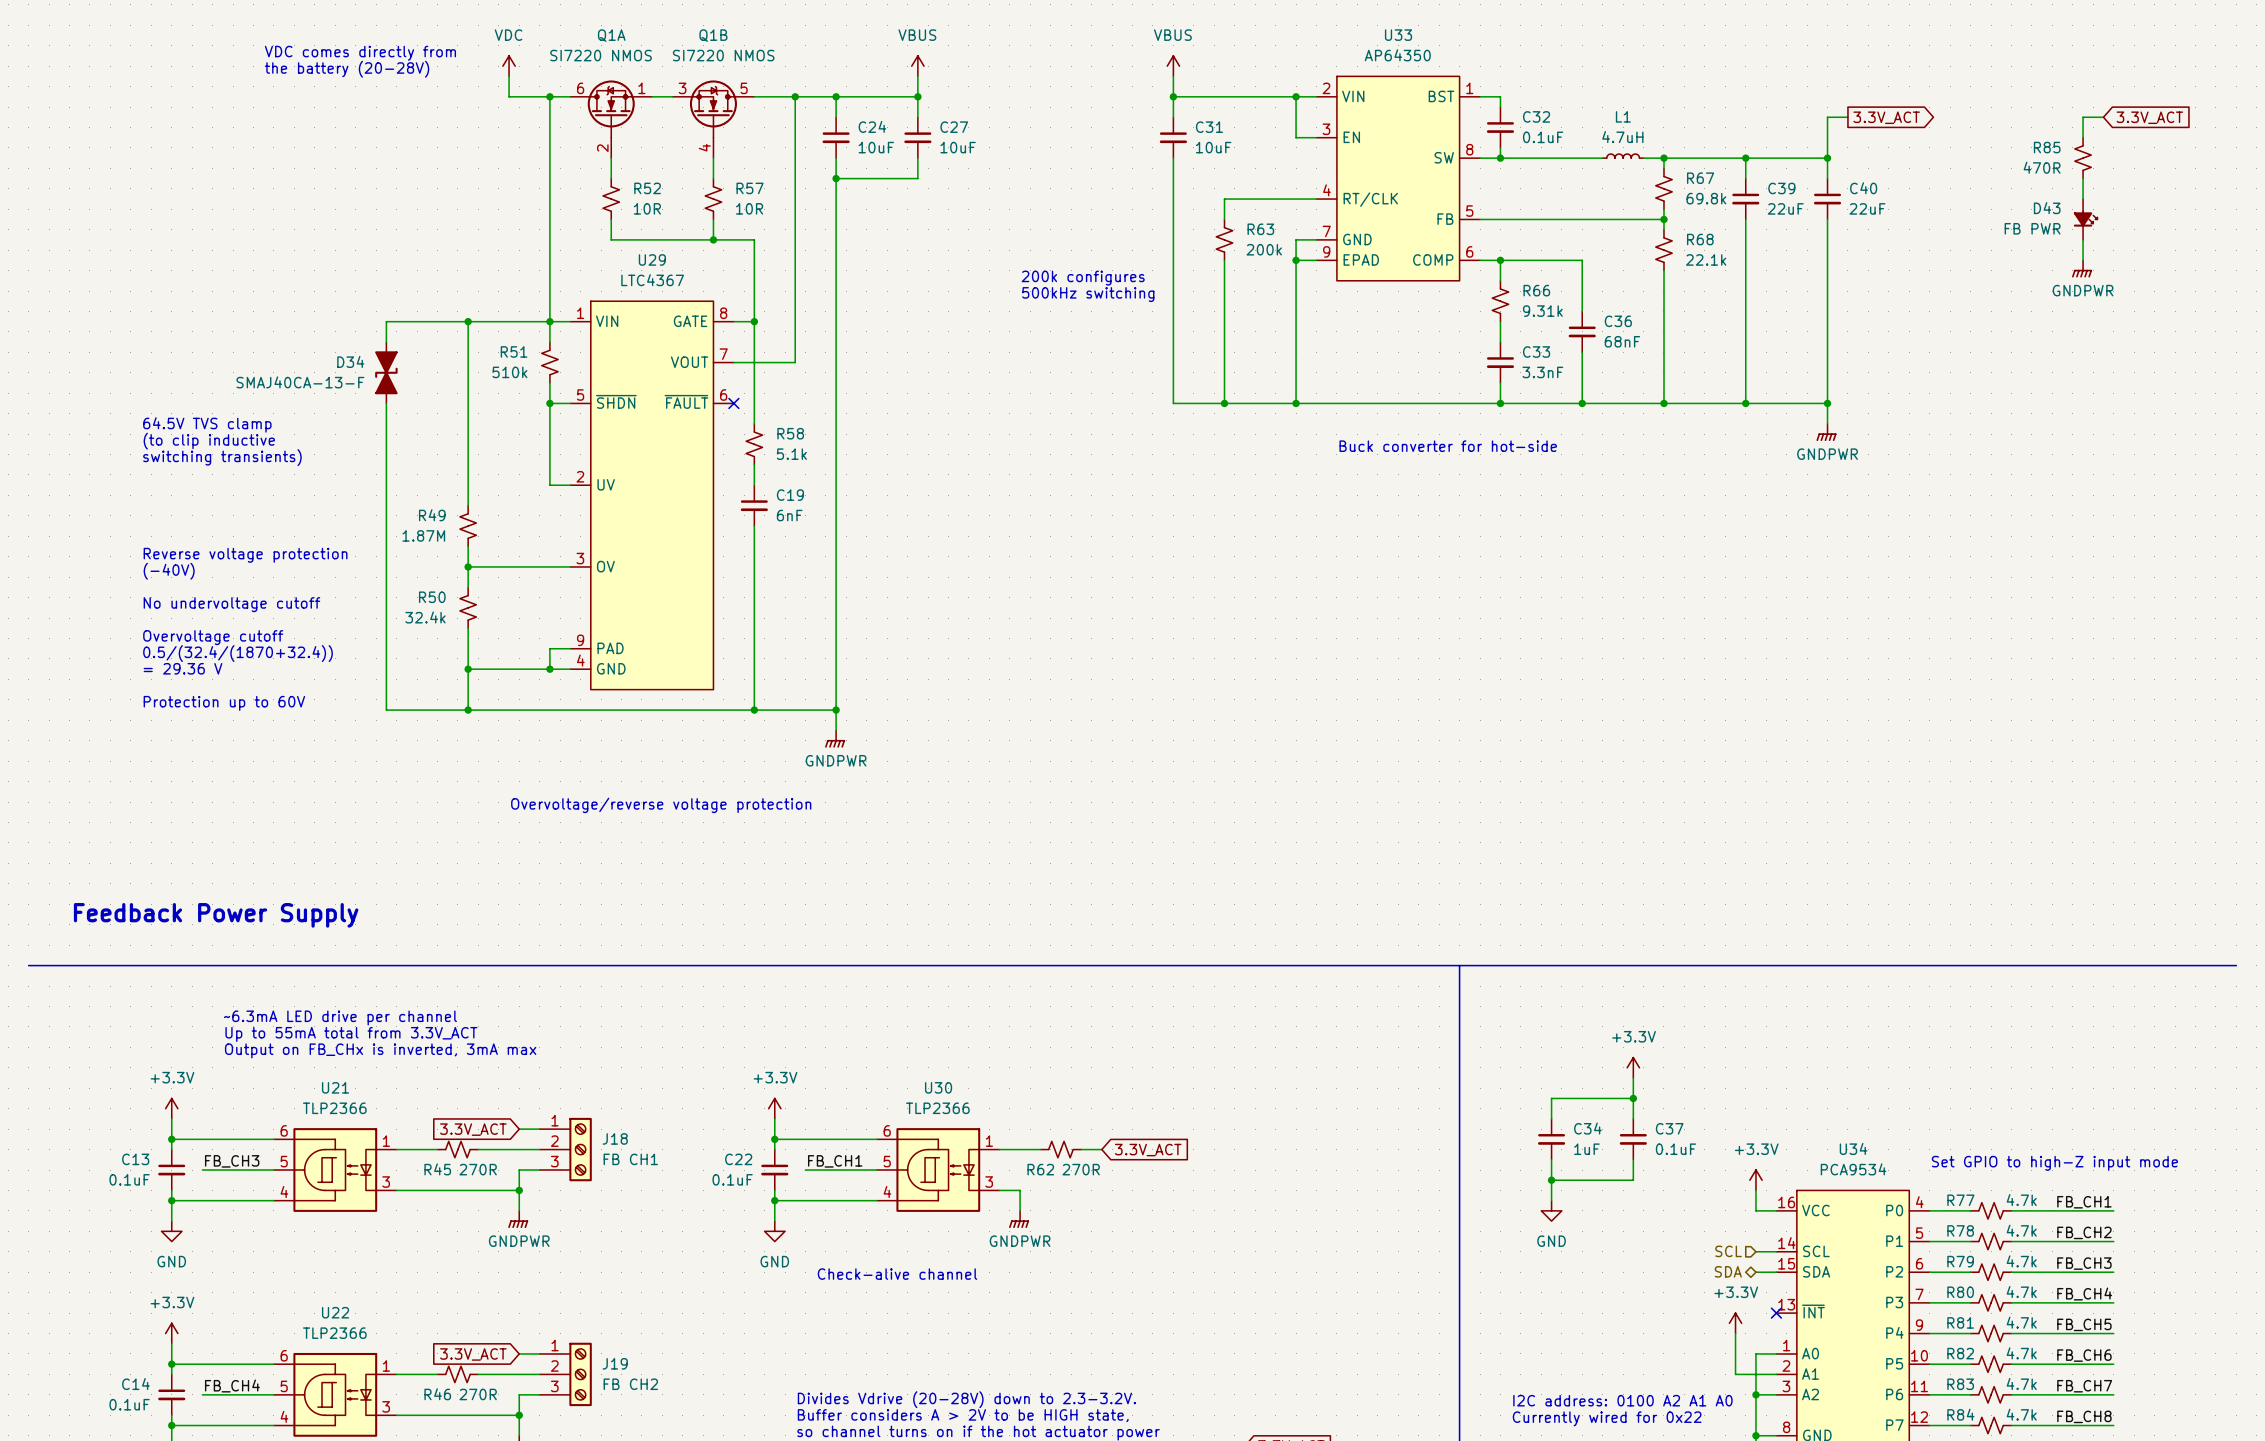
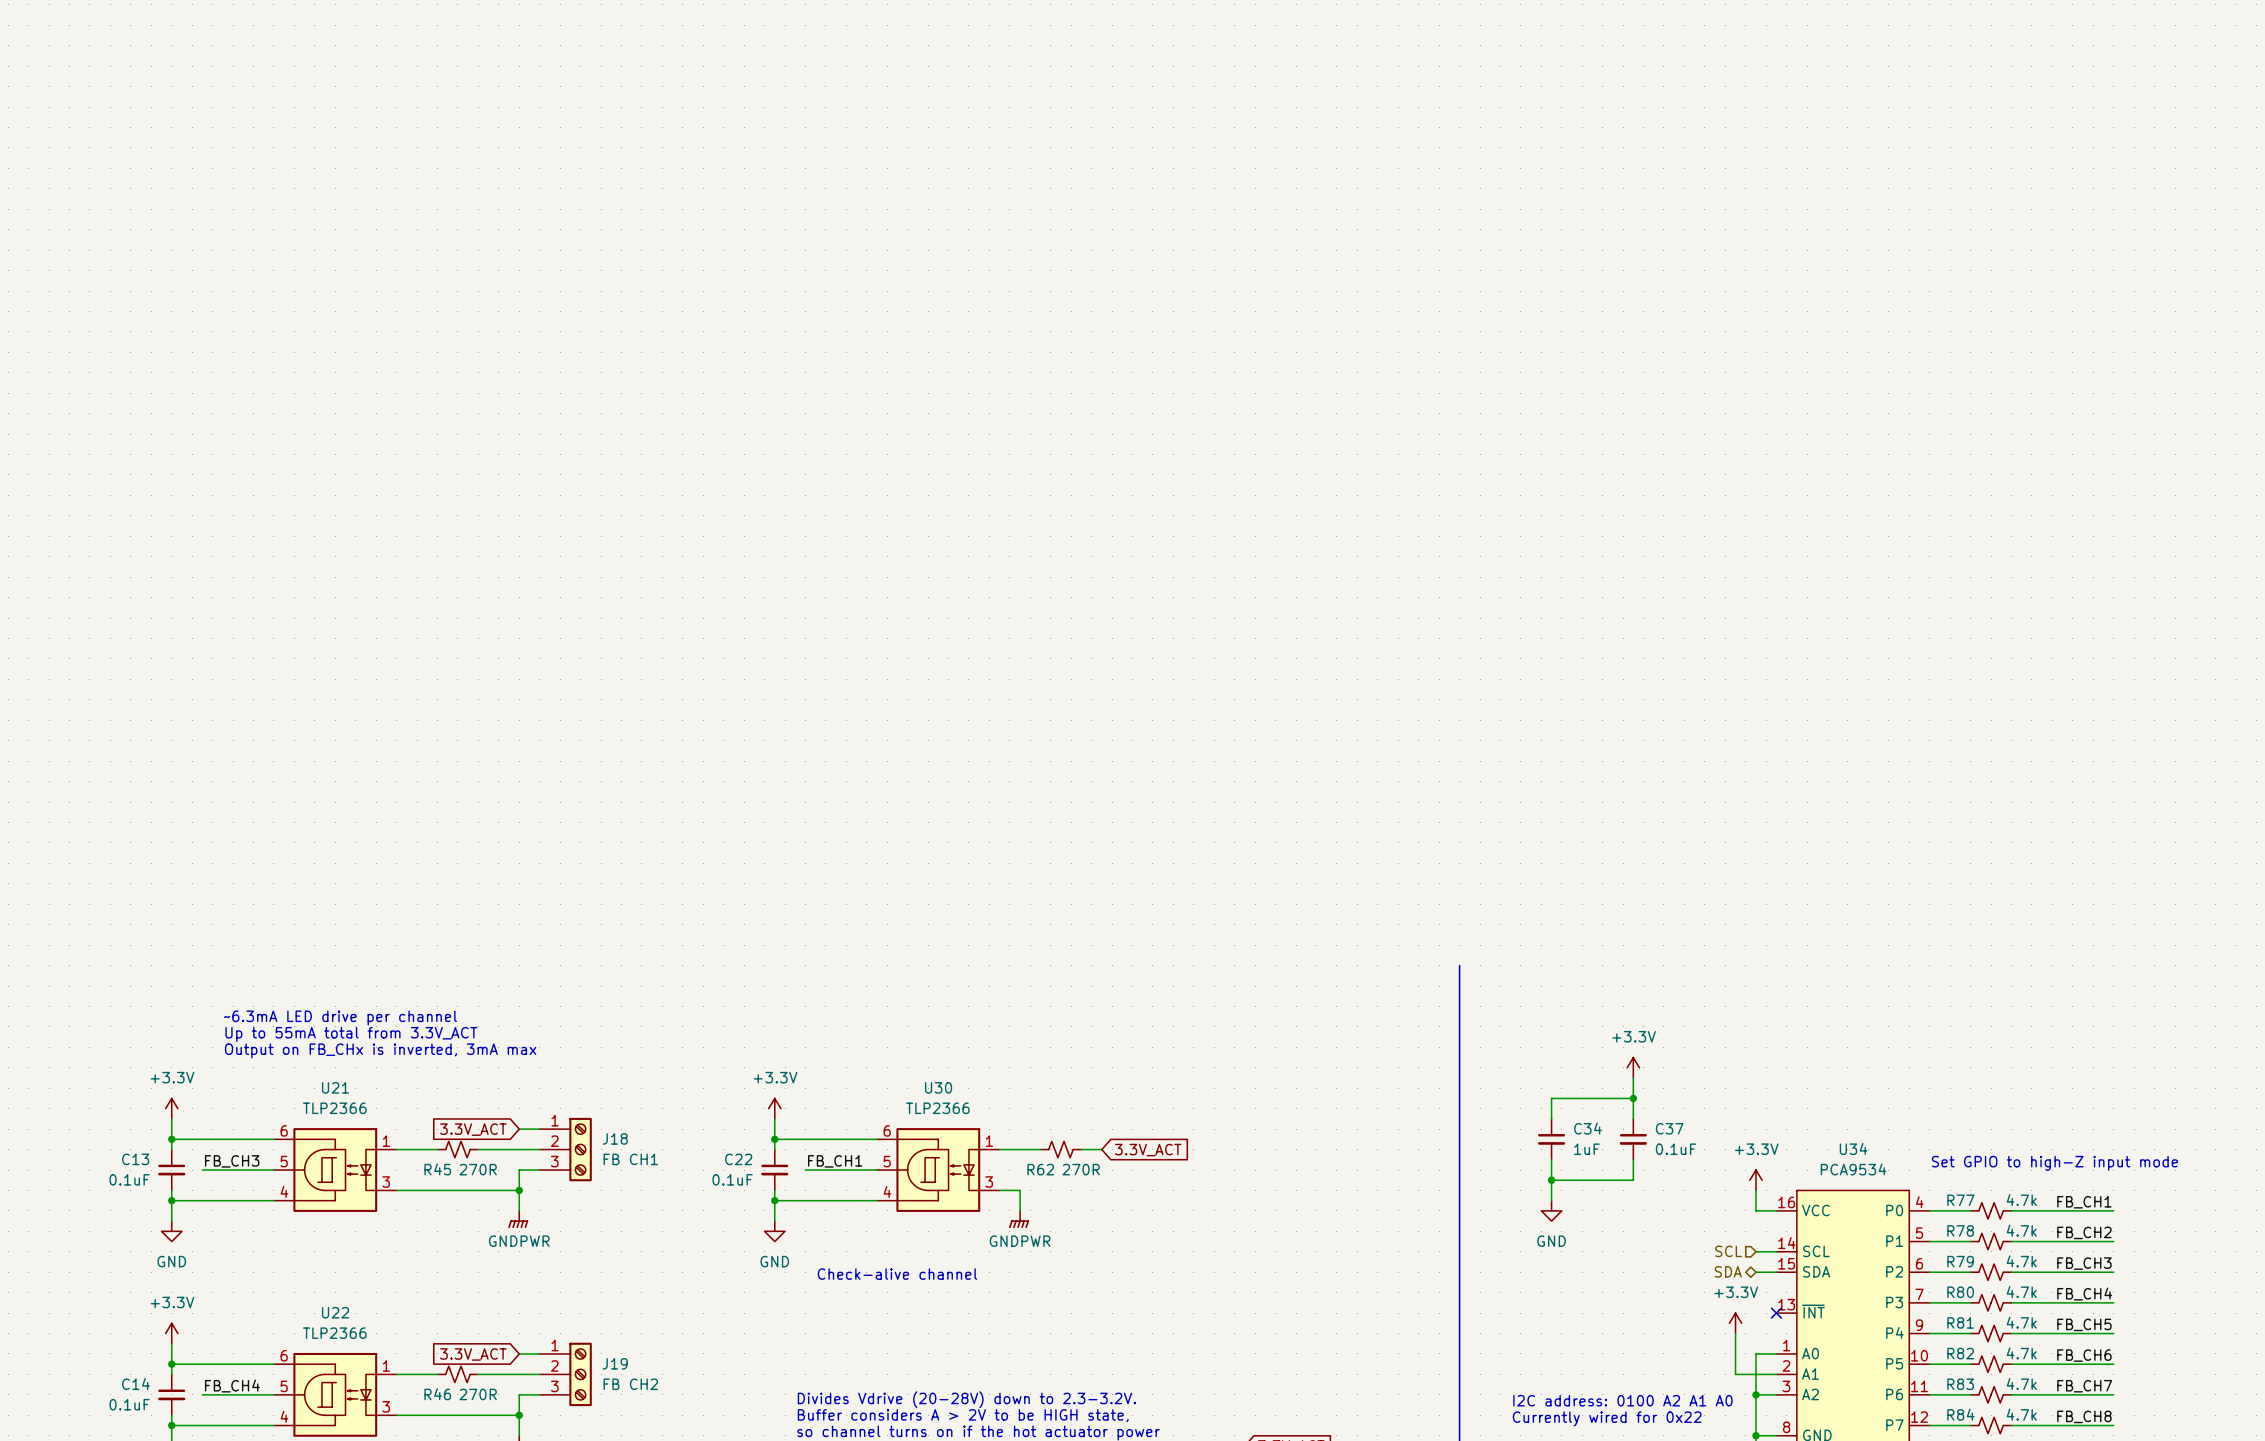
text: VDC comes directly from (360, 53) -> none
power symbol: VDC (509, 66) -> none
power symbol: VBUS (917, 66) -> none
power symbol: VBUS (1173, 66) -> none
text: the battery (20-28V) (347, 69) -> none
wire: (509, 76) (509, 96) (570, 96) -> none
wire: (917, 76) (917, 117) -> none
wire: (1173, 76) (1173, 117) -> none
wire: (549, 96) (549, 342) -> none
junction: (549, 96) -> none
wire: (652, 96) (672, 96) -> none
wire: (754, 96) (917, 96) -> none
wire: (795, 96) (795, 362) (733, 362) -> none
junction: (795, 96) -> none
wire: (836, 96) (836, 117) -> none
junction: (836, 96) -> none
junction: (917, 96) -> none
wire: (1173, 96) (1316, 96) -> none
junction: (1173, 96) -> none
wire: (1296, 96) (1296, 137) (1316, 137) -> none
junction: (1296, 96) -> none
wire: (1480, 96) (1500, 96) (1500, 107) -> none
wire: (1847, 117) (1827, 117) (1827, 178) -> none
global label: 3.3V_ACT (1886, 117) -> none
wire: (2103, 117) (2083, 117) (2083, 137) -> none
global label: 3.3V_ACT (2149, 117) -> none
Q1A: SI7220 NMOS (611, 119) -> none
Q1B: SI7220 NMOS (713, 119) -> none
C32: 0.1uF (1500, 127) -> none
C24: 10uF (836, 137) -> none
C27: 10uF (917, 137) -> none
C31: 10uF (1173, 137) -> none
wire: (1500, 147) (1500, 158) -> none
L1: 4.7uH (1623, 156) -> none
wire: (611, 158) (611, 178) -> none
wire: (713, 158) (713, 178) -> none
wire: (836, 158) (836, 730) -> none
wire: (917, 158) (917, 178) (836, 178) -> none
wire: (1173, 158) (1173, 403) (1827, 403) -> none
wire: (1480, 158) (1602, 158) -> none
junction: (1500, 158) -> none
wire: (1643, 158) (1827, 158) -> none
wire: (1663, 158) (1663, 168) -> none
junction: (1663, 158) -> none
wire: (1745, 158) (1745, 178) -> none
junction: (1745, 158) -> none
junction: (1827, 158) -> none
R85: 470R (2083, 158) -> none
junction: (836, 178) -> none
U33: AP64350 (1398, 178) -> none
wire: (2083, 178) (2083, 199) -> none
R67: 69.8k (1663, 188) -> none
R52: 10R (611, 199) -> none
R57: 10R (713, 199) -> none
wire: (1316, 199) (1224, 199) (1224, 219) -> none
C39: 22uF (1745, 199) -> none
C40: 22uF (1827, 199) -> none
wire: (1663, 209) (1663, 229) -> none
wire: (611, 219) (611, 239) (754, 239) (754, 423) -> none
wire: (713, 219) (713, 239) -> none
wire: (1480, 219) (1663, 219) -> none
junction: (1663, 219) -> none
wire: (1745, 219) (1745, 403) -> none
wire: (1827, 219) (1827, 423) -> none
D43: FB PWR (2085, 219) -> none
junction: (713, 239) -> none
R63: 200k (1224, 239) -> none
wire: (1316, 239) (1296, 239) (1296, 403) -> none
wire: (2083, 239) (2083, 260) -> none
R68: 22.1k (1663, 250) -> none
wire: (1224, 260) (1224, 403) -> none
wire: (1296, 260) (1316, 260) -> none
junction: (1296, 260) -> none
wire: (1480, 260) (1582, 260) (1582, 311) -> none
wire: (1500, 260) (1500, 280) -> none
junction: (1500, 260) -> none
power symbol: GNDPWR (2082, 268) -> none
wire: (1663, 270) (1663, 403) -> none
text: 200k configures (1083, 278) -> none
text: 500kHz switching (1088, 294) -> none
R66: 9.31k (1500, 301) -> none
wire: (468, 321) (468, 505) -> none
junction: (468, 321) -> none
junction: (549, 321) -> none
wire: (570, 321) (386, 321) (386, 342) -> none
wire: (733, 321) (754, 321) -> none
junction: (754, 321) -> none
wire: (1500, 321) (1500, 342) -> none
C36: 68nF (1582, 331) -> none
wire: (1582, 352) (1582, 403) -> none
R51: 510k (549, 362) -> none
C33: 3.3nF (1500, 362) -> none
D34: SMAJ40CA-13-F (386, 372) -> none
wire: (549, 383) (549, 485) (570, 485) -> none
wire: (1500, 383) (1500, 403) -> none
wire: (386, 403) (386, 710) (836, 710) -> none
wire: (549, 403) (570, 403) -> none
junction: (549, 403) -> none
no-connect mark: (733, 403) -> none
junction: (1224, 403) -> none
junction: (1296, 403) -> none
junction: (1500, 403) -> none
junction: (1582, 403) -> none
junction: (1663, 403) -> none
junction: (1745, 403) -> none
junction: (1827, 403) -> none
text: 64.5V TVS clamp (207, 424) -> none
power symbol: GNDPWR (1826, 432) -> none
text: (to clip inductive (209, 441) -> none
R58: 5.1k (754, 444) -> none
text: Buck converter for hot-side (1448, 446) -> none
text: switching transients) (222, 457) -> none
wire: (754, 464) (754, 485) -> none
U29: LTC4367 (652, 495) -> none
C19: 6nF (754, 505) -> none
R49: 1.87M (468, 526) -> none
wire: (754, 526) (754, 710) -> none
wire: (468, 546) (468, 587) -> none
text: Reverse voltage protection (245, 555) -> none
wire: (468, 566) (570, 566) -> none
junction: (468, 566) -> none
text: (-40V) (169, 571) -> none
text: No undervoltage cutoff (231, 604) -> none
R50: 32.4k (468, 607) -> none
wire: (468, 628) (468, 710) -> none
text: Overvoltage cutoff (213, 637) -> none
wire: (570, 648) (549, 648) (549, 669) -> none
text: 0.5/(32.4/(1870+32.4)) (238, 653) -> none
text: = 29.36 V (183, 668) -> none
wire: (468, 669) (570, 669) -> none
junction: (468, 669) -> none
junction: (549, 669) -> none
text: Protection up to 60V (224, 703) -> none
junction: (468, 710) -> none
junction: (754, 710) -> none
junction: (836, 710) -> none
power symbol: GNDPWR (835, 739) -> none
text: Overvoltage/reverse voltage protection (661, 805) -> none
text: Feedback Power Supply (216, 915) -> none
line: (28, 965) (2236, 965) -> none

